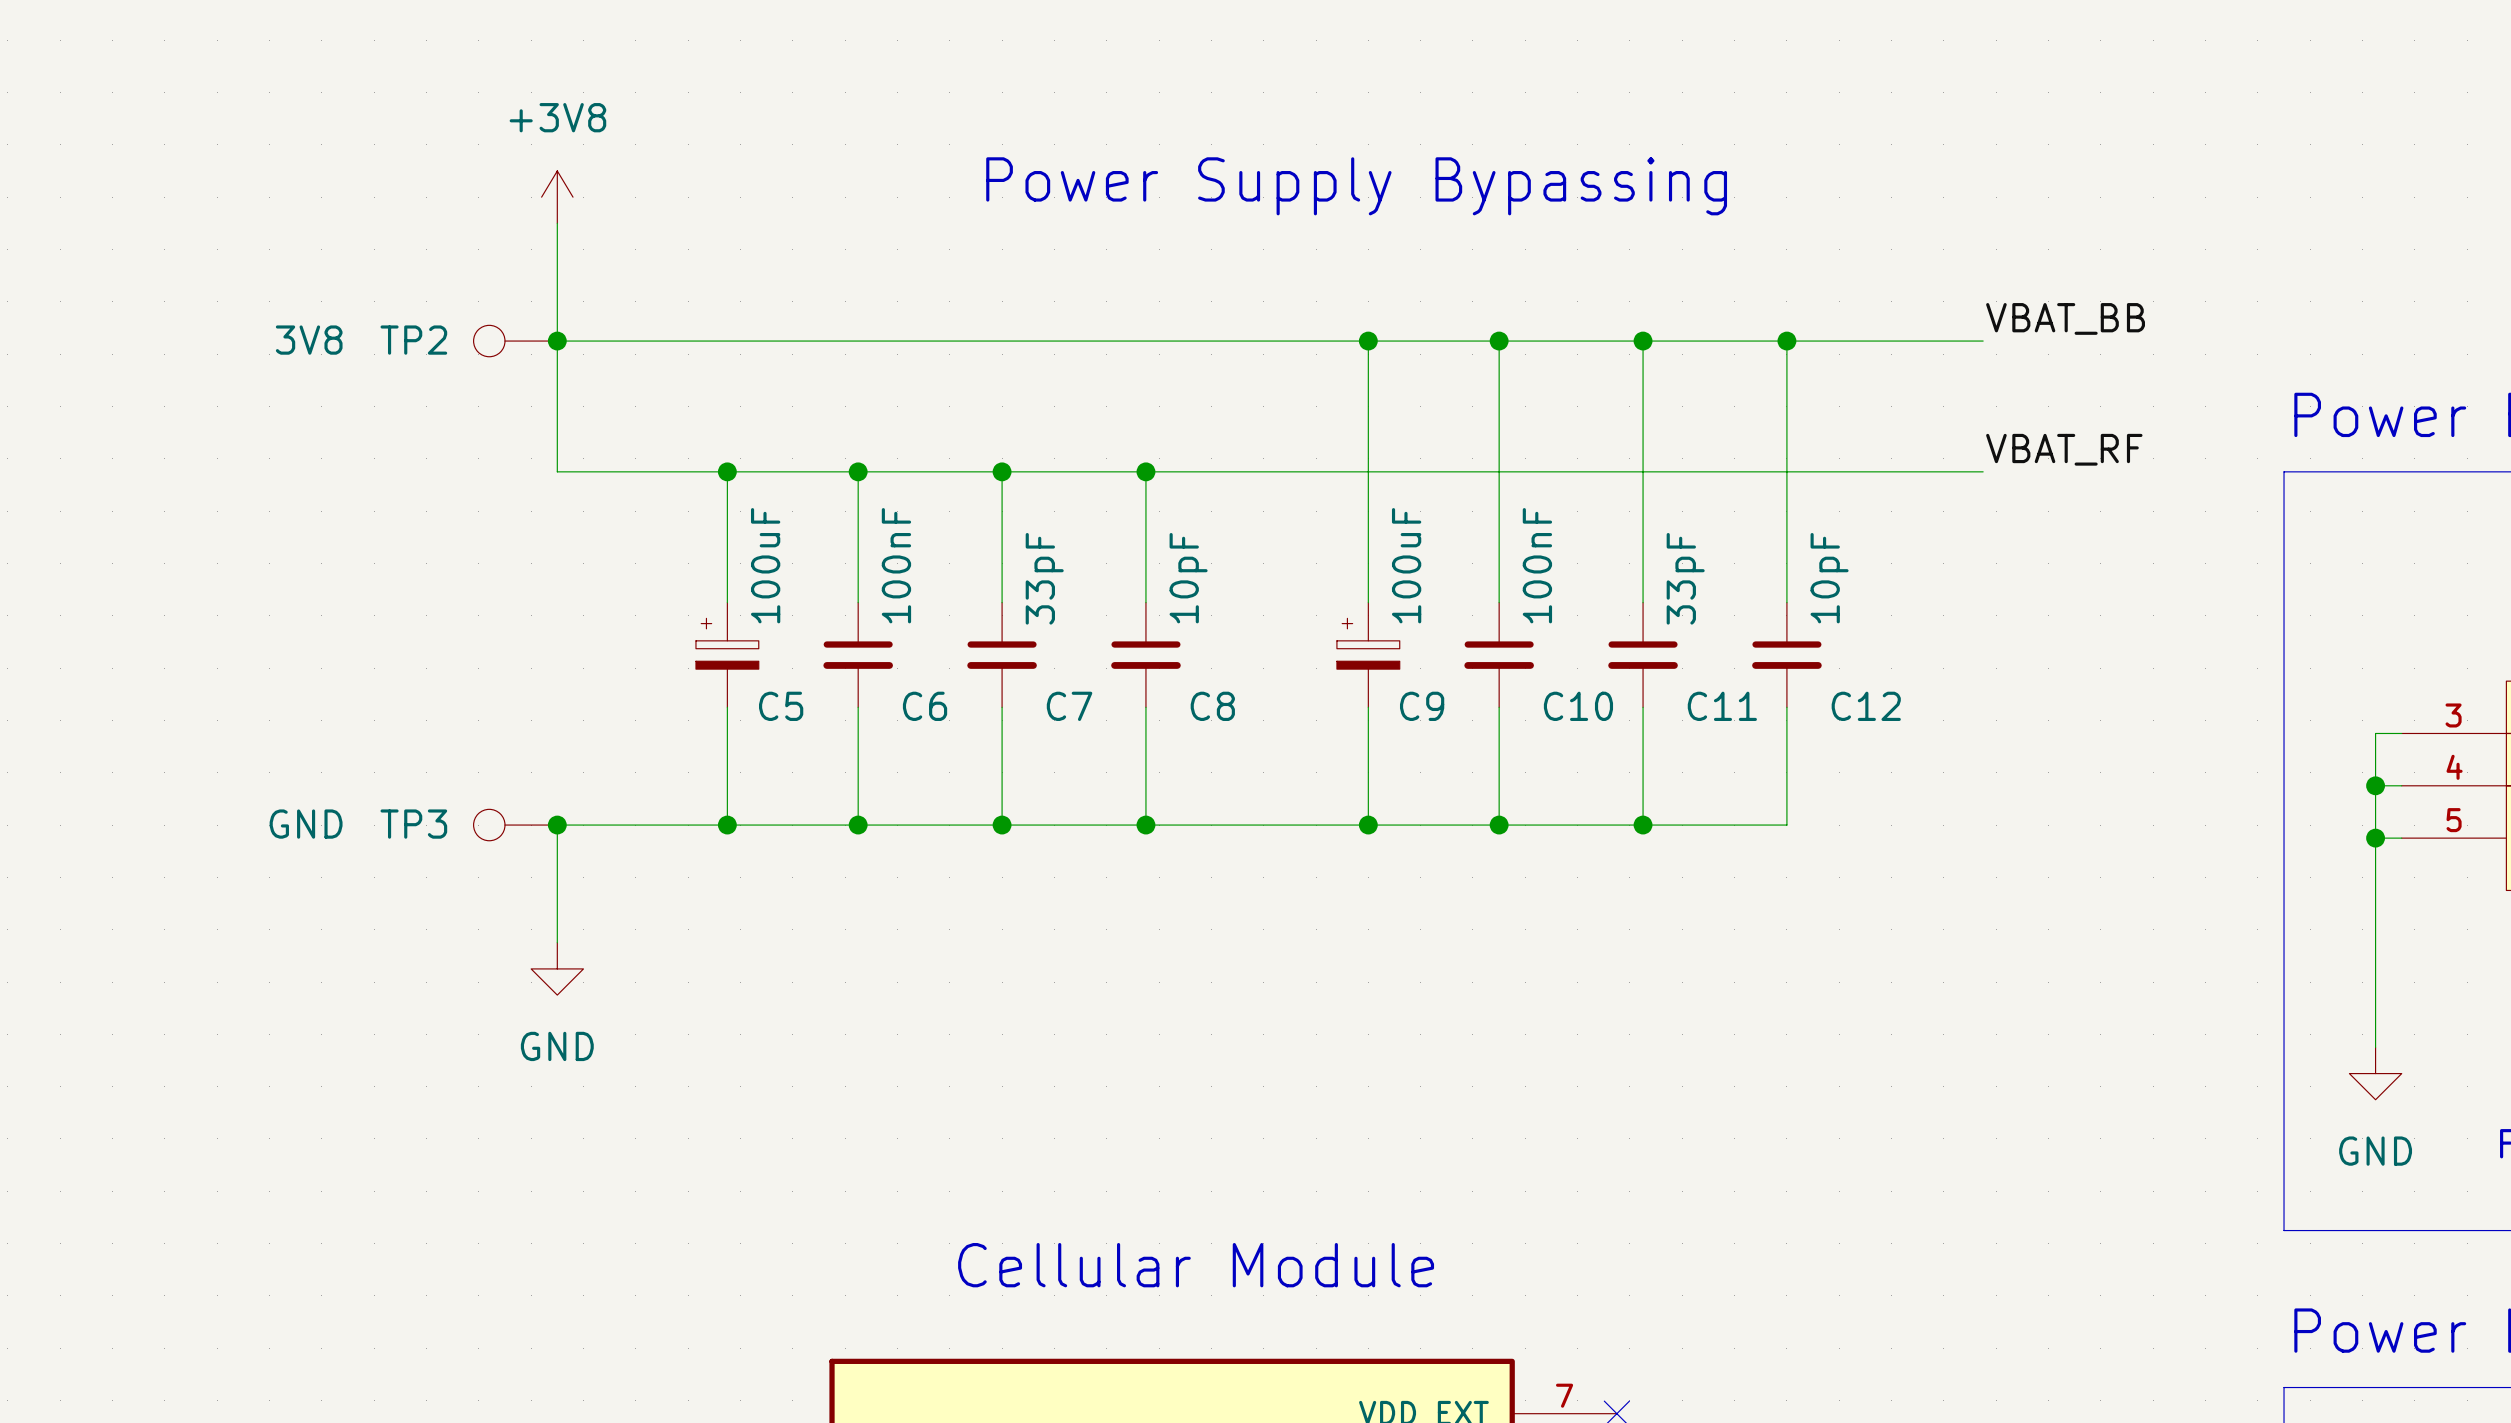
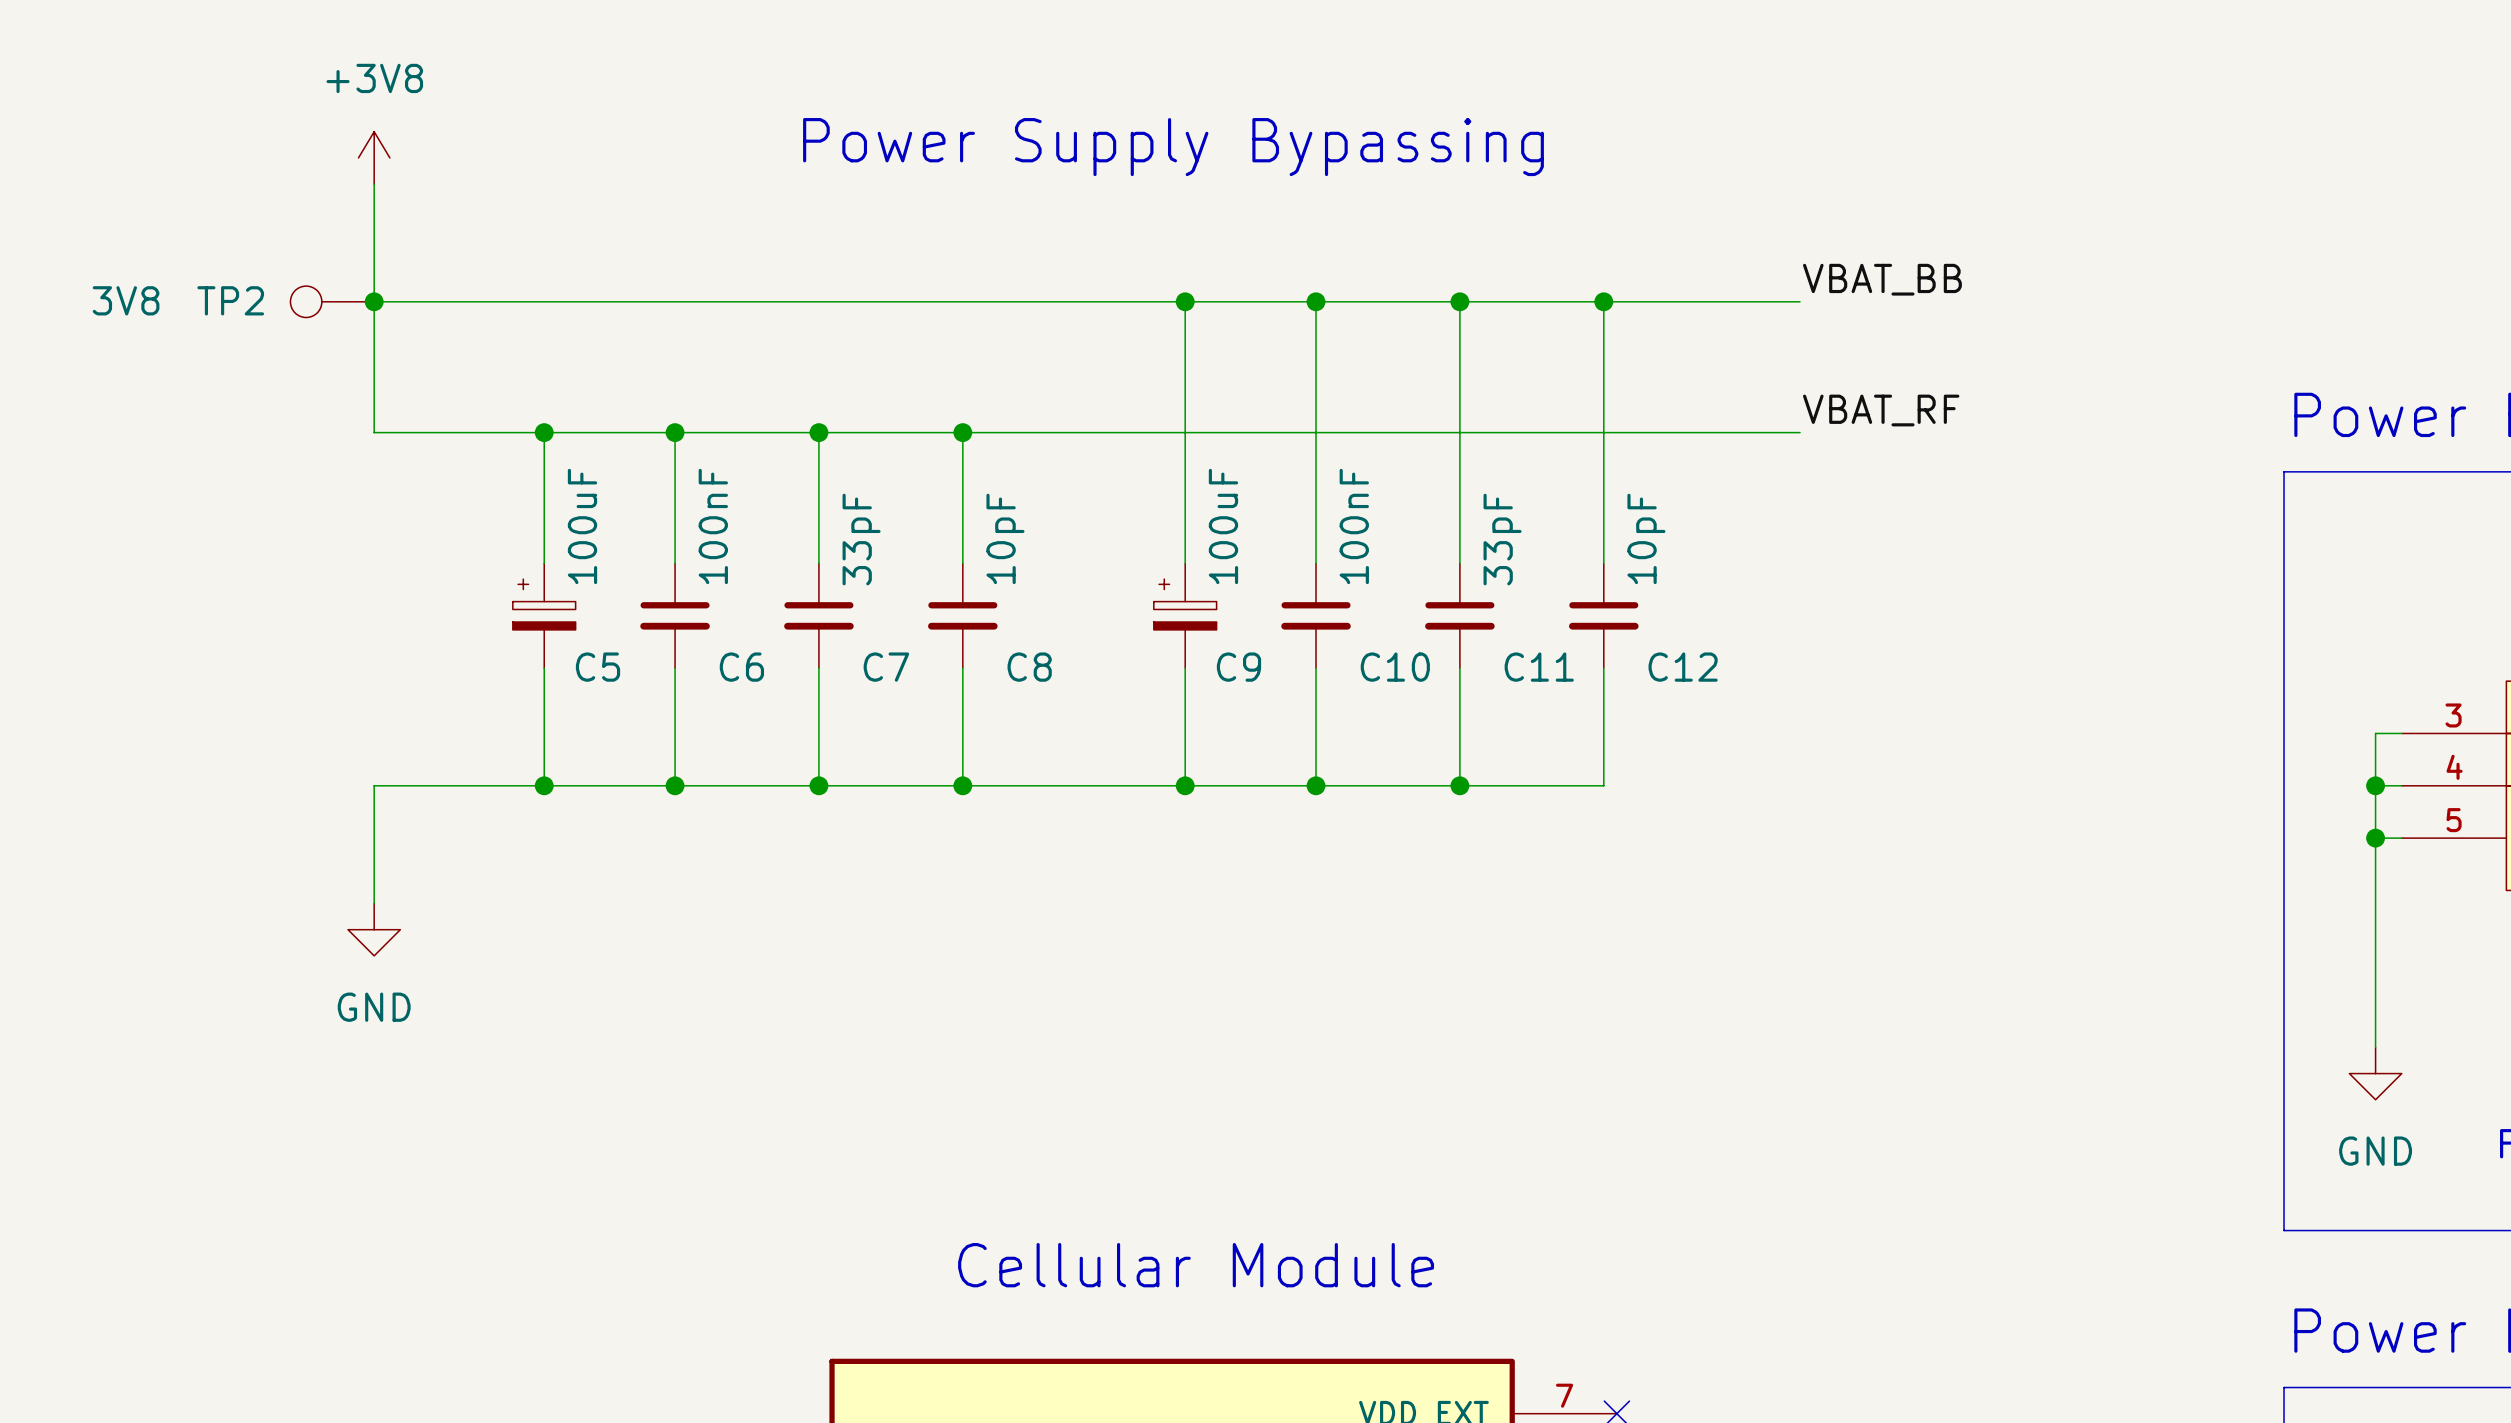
text position: Power Supply Bypassing (1356, 186) -> Power Supply Bypassing (1173, 147)
power symbol position: +3V8 (557, 197) -> +3V8 (374, 157)
wire: (557, 223) (557, 471) (1983, 471) -> (374, 184) (374, 432) (1800, 432)
junction: none -> (374, 301)
junction: none -> (1185, 301)
junction: none -> (1316, 301)
junction: none -> (1459, 301)
label position: VBAT_BB (2065, 318) -> VBAT_BB (1882, 279)
TP2 position: (515, 341) -> (332, 301)
wire: (557, 341) (1983, 341) -> (374, 301) (1800, 301)
junction: (557, 341) -> none
wire: (1368, 341) (1368, 602) -> (1185, 301) (1185, 563)
junction: (1368, 341) -> none
wire: (1499, 341) (1499, 602) -> (1316, 301) (1316, 563)
junction: (1499, 341) -> none
wire: (1643, 341) (1643, 602) -> (1459, 301) (1459, 563)
junction position: (1643, 341) -> (1603, 301)
wire: (1786, 341) (1786, 602) -> (1603, 301) (1603, 563)
junction: (1786, 341) -> none
junction: none -> (544, 432)
junction: none -> (675, 432)
junction: none -> (818, 432)
label position: VBAT_RF (2064, 449) -> VBAT_RF (1881, 410)
wire: (727, 471) (727, 602) -> (544, 432) (544, 563)
junction: (727, 471) -> none
wire: (858, 471) (858, 602) -> (675, 432) (675, 563)
junction: (858, 471) -> none
wire: (1002, 471) (1002, 602) -> (818, 432) (818, 563)
junction position: (1002, 471) -> (962, 432)
wire: (1145, 471) (1145, 602) -> (962, 432) (962, 563)
junction: (1145, 471) -> none
C5 position: (727, 654) -> (544, 615)
C6 position: (858, 654) -> (675, 615)
C7 position: (1002, 654) -> (818, 615)
C8 position: (1145, 654) -> (962, 615)
C9 position: (1368, 654) -> (1185, 615)
C10 position: (1499, 654) -> (1316, 615)
C11 position: (1643, 654) -> (1459, 615)
C12 position: (1786, 654) -> (1603, 615)
wire: (727, 707) (727, 825) -> (544, 668) (544, 785)
wire: (858, 707) (858, 825) -> (675, 668) (675, 785)
wire: (1002, 707) (1002, 825) -> (818, 668) (818, 785)
wire: (1145, 707) (1145, 825) -> (962, 668) (962, 785)
wire: (1368, 707) (1368, 825) -> (1185, 668) (1185, 785)
wire: (1499, 707) (1499, 825) -> (1316, 668) (1316, 785)
wire: (1643, 707) (1643, 825) -> (1459, 668) (1459, 785)
wire: (1786, 707) (1786, 825) (557, 825) (557, 942) -> (1603, 668) (1603, 785) (374, 785) (374, 903)
junction: none -> (675, 785)
junction: none -> (818, 785)
junction: none -> (1316, 785)
junction: none -> (1459, 785)
TP3: GND (515, 825) -> none
junction position: (557, 825) -> (544, 785)
junction: (727, 825) -> none
junction: (858, 825) -> none
junction position: (1002, 825) -> (962, 785)
junction position: (1145, 825) -> (1185, 785)
junction: (1368, 825) -> none
junction: (1499, 825) -> none
junction: (1643, 825) -> none
power symbol position: GND (557, 968) -> GND (374, 929)

